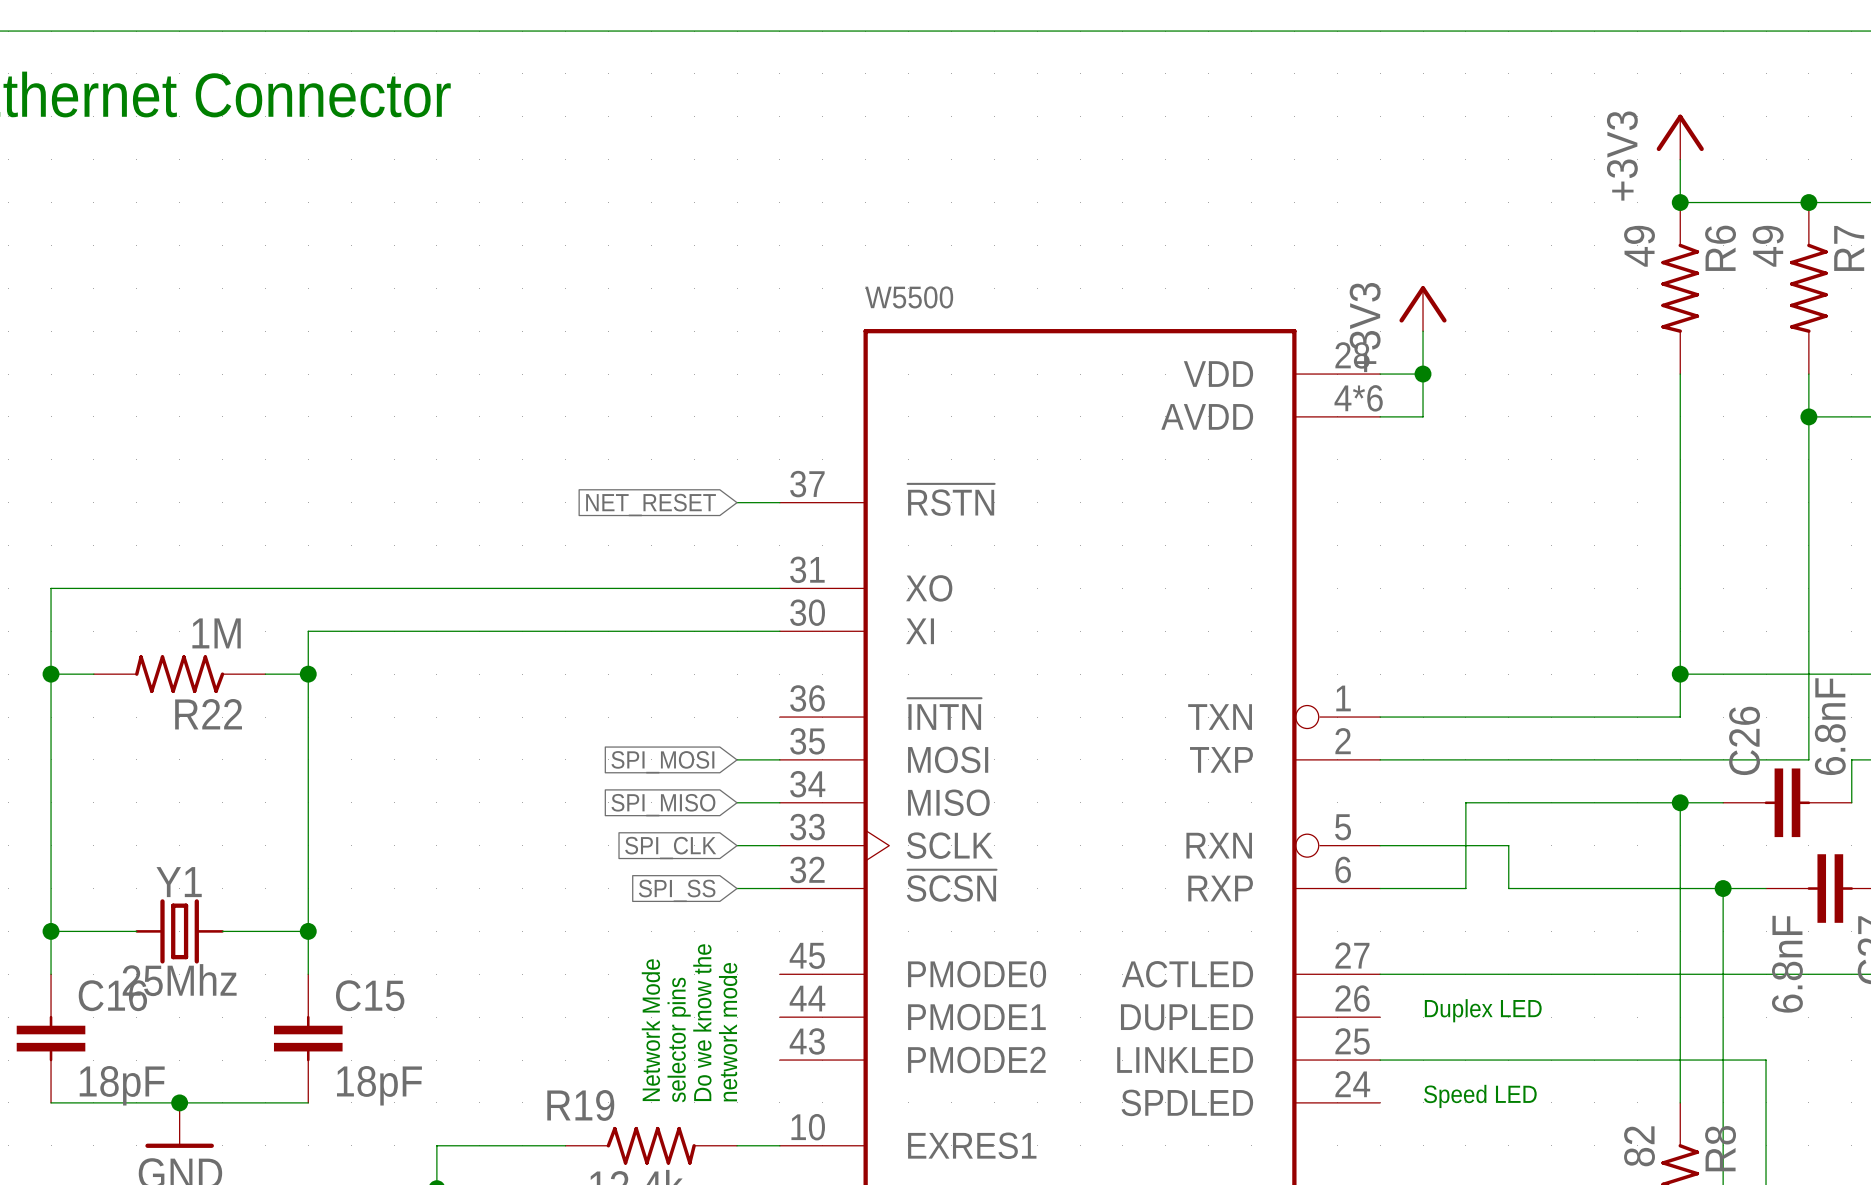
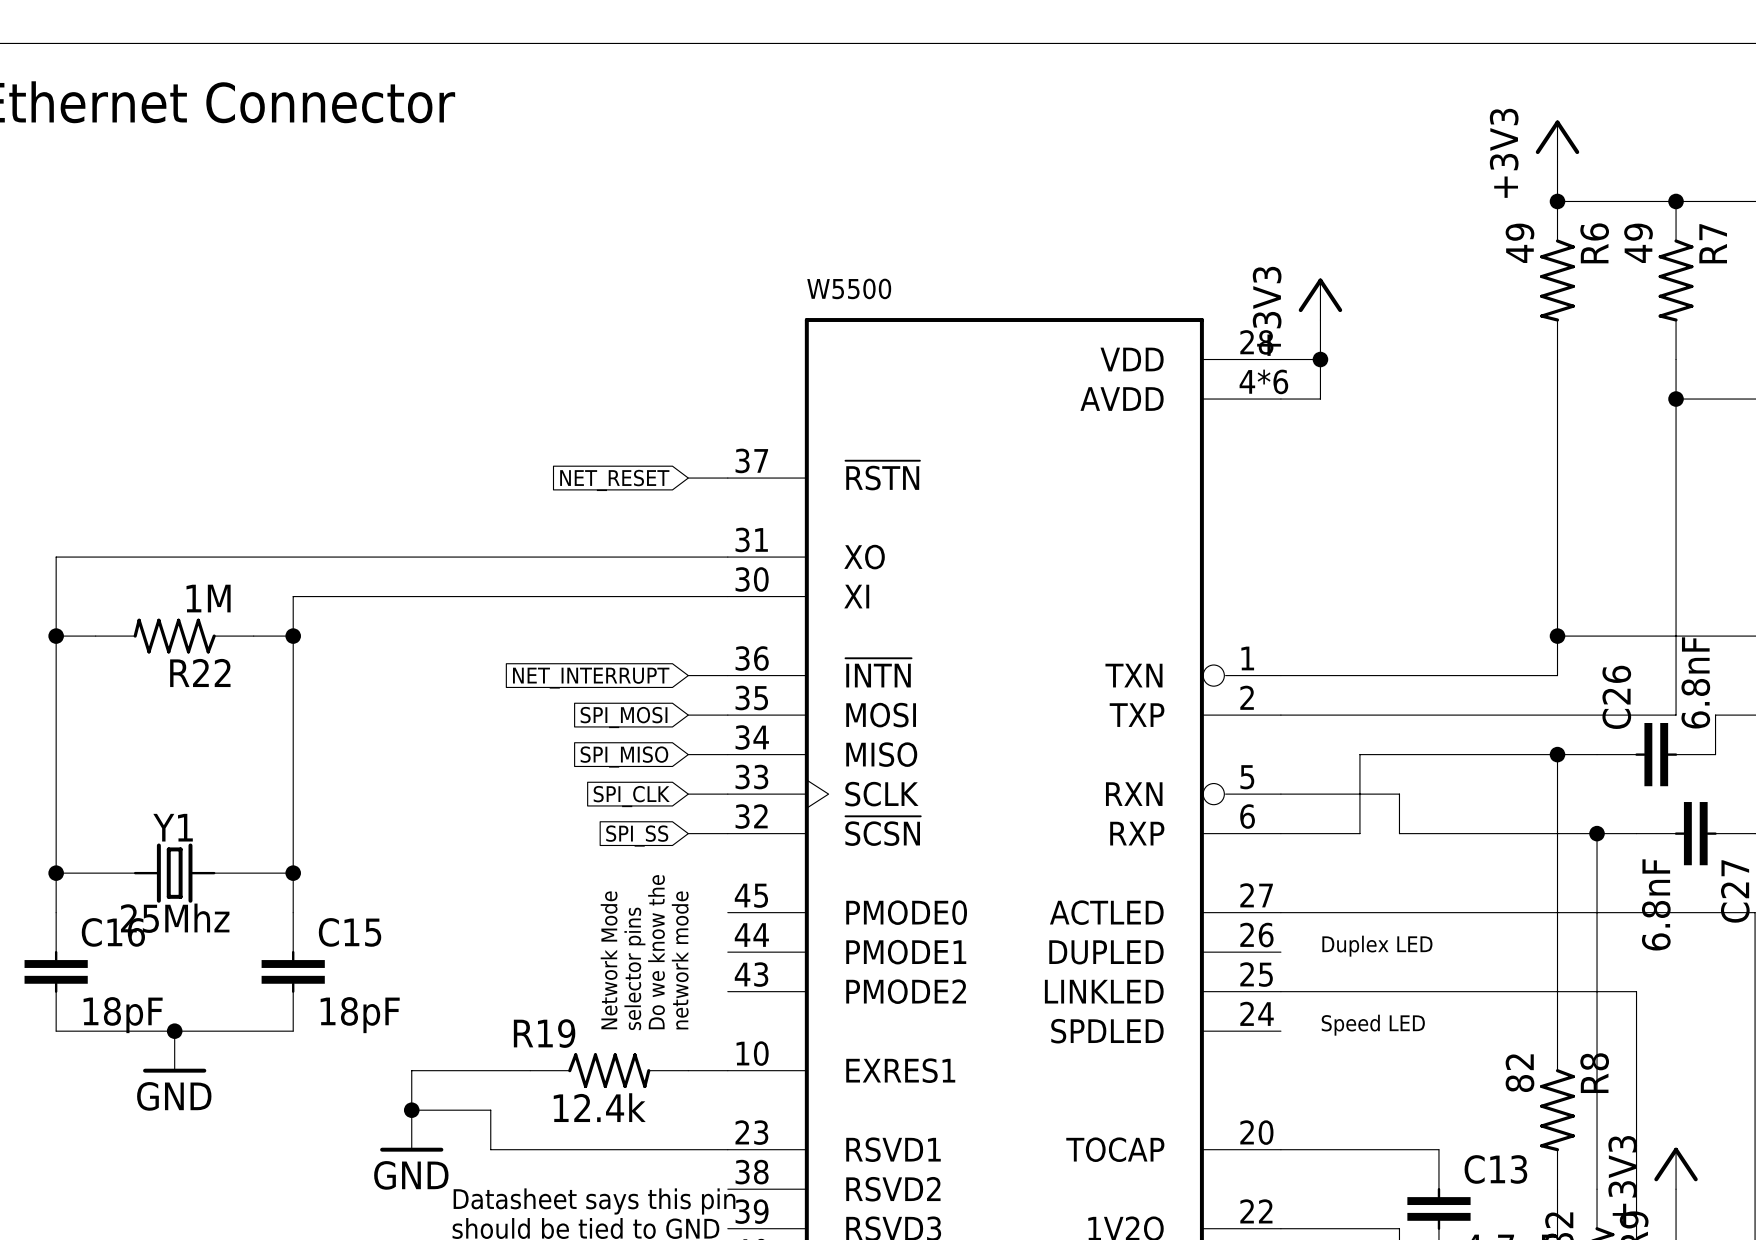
wire: none -> (688, 675) (727, 675)
global label: none -> NET_INTERRUPT (591, 678)

